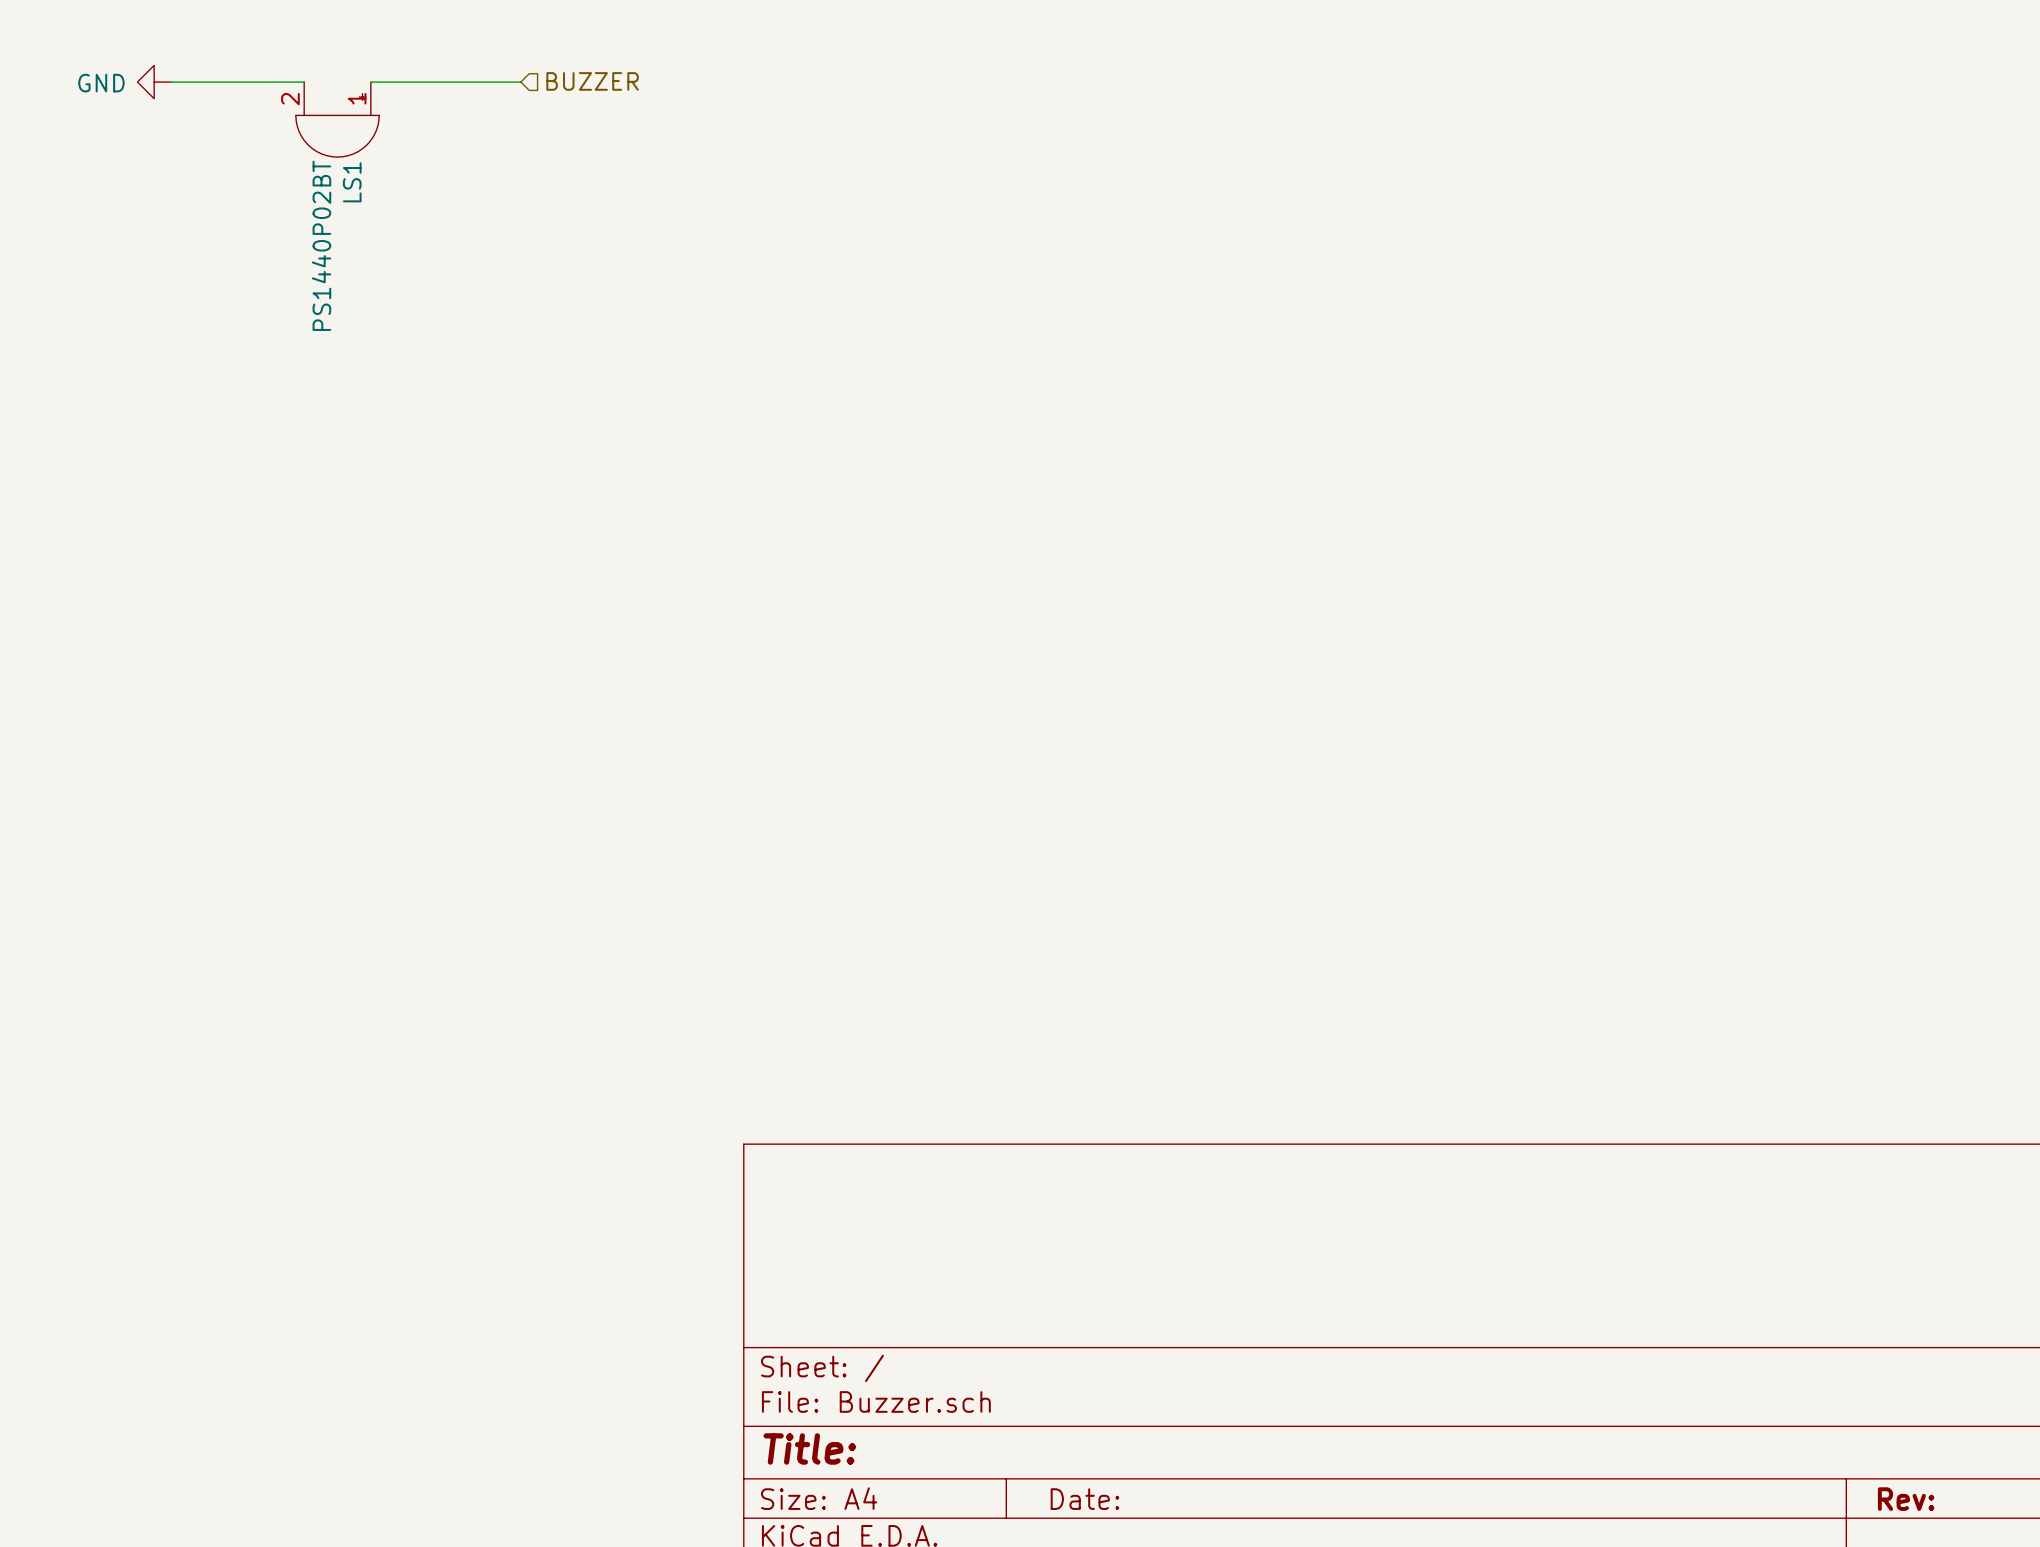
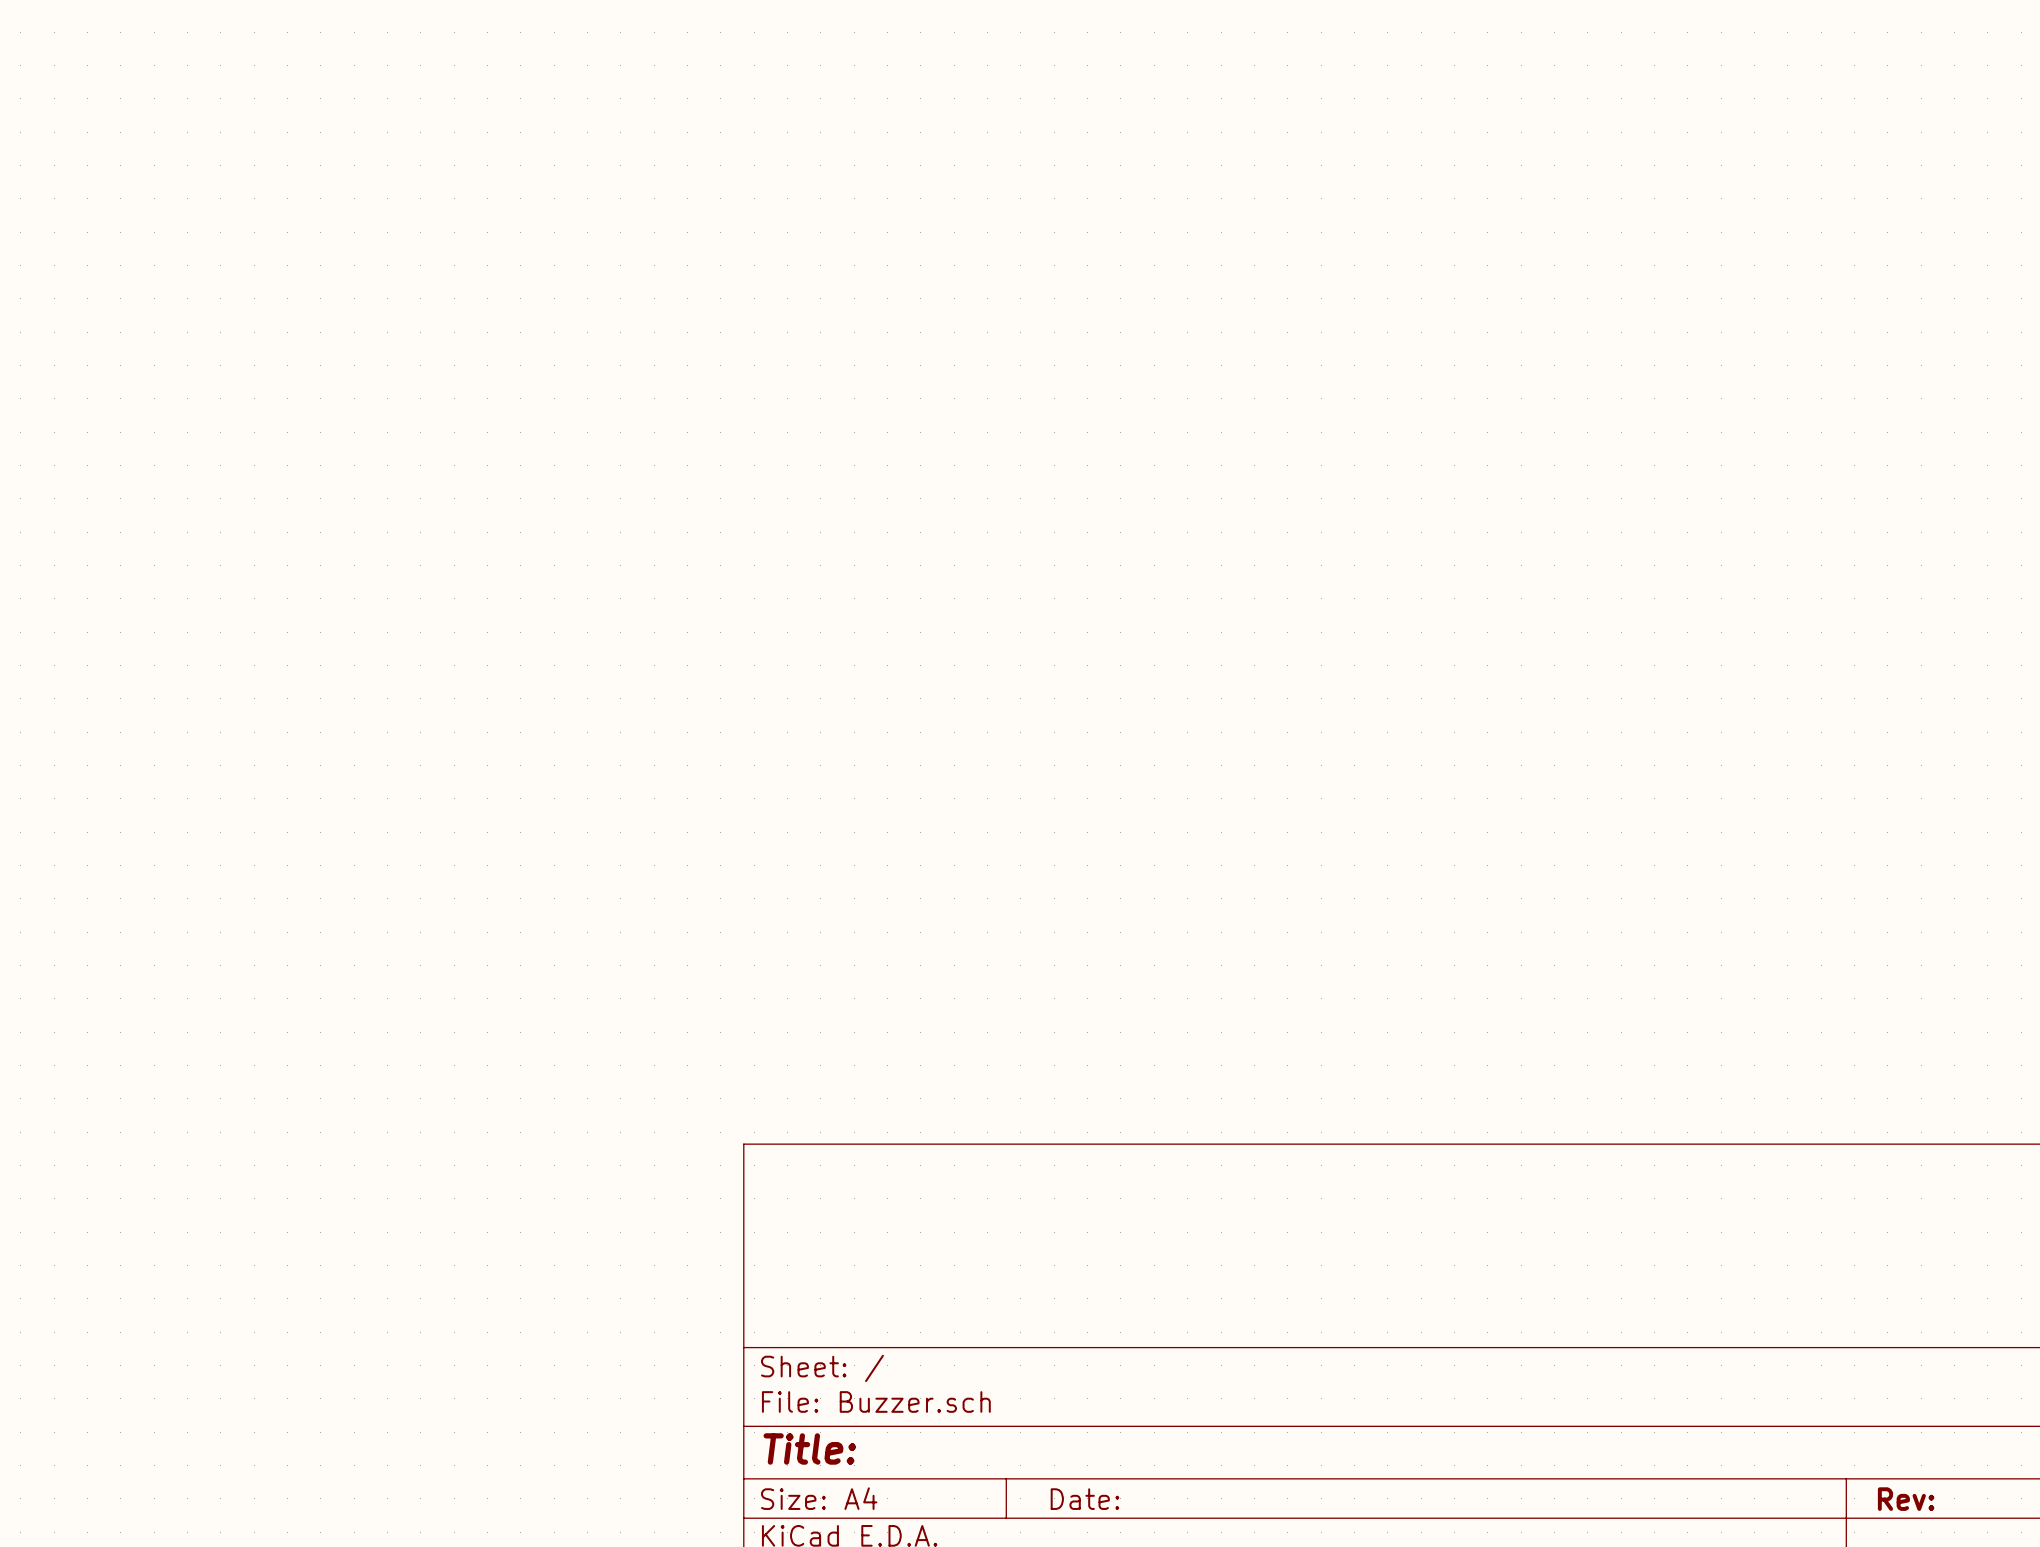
hierarchical label: BUZZER (592, 81) -> none
power symbol: GND (154, 82) -> none
wire: (170, 82) (304, 82) -> none
wire: (370, 82) (520, 82) -> none
LS1: PS1440P02BT (337, 119) -> none

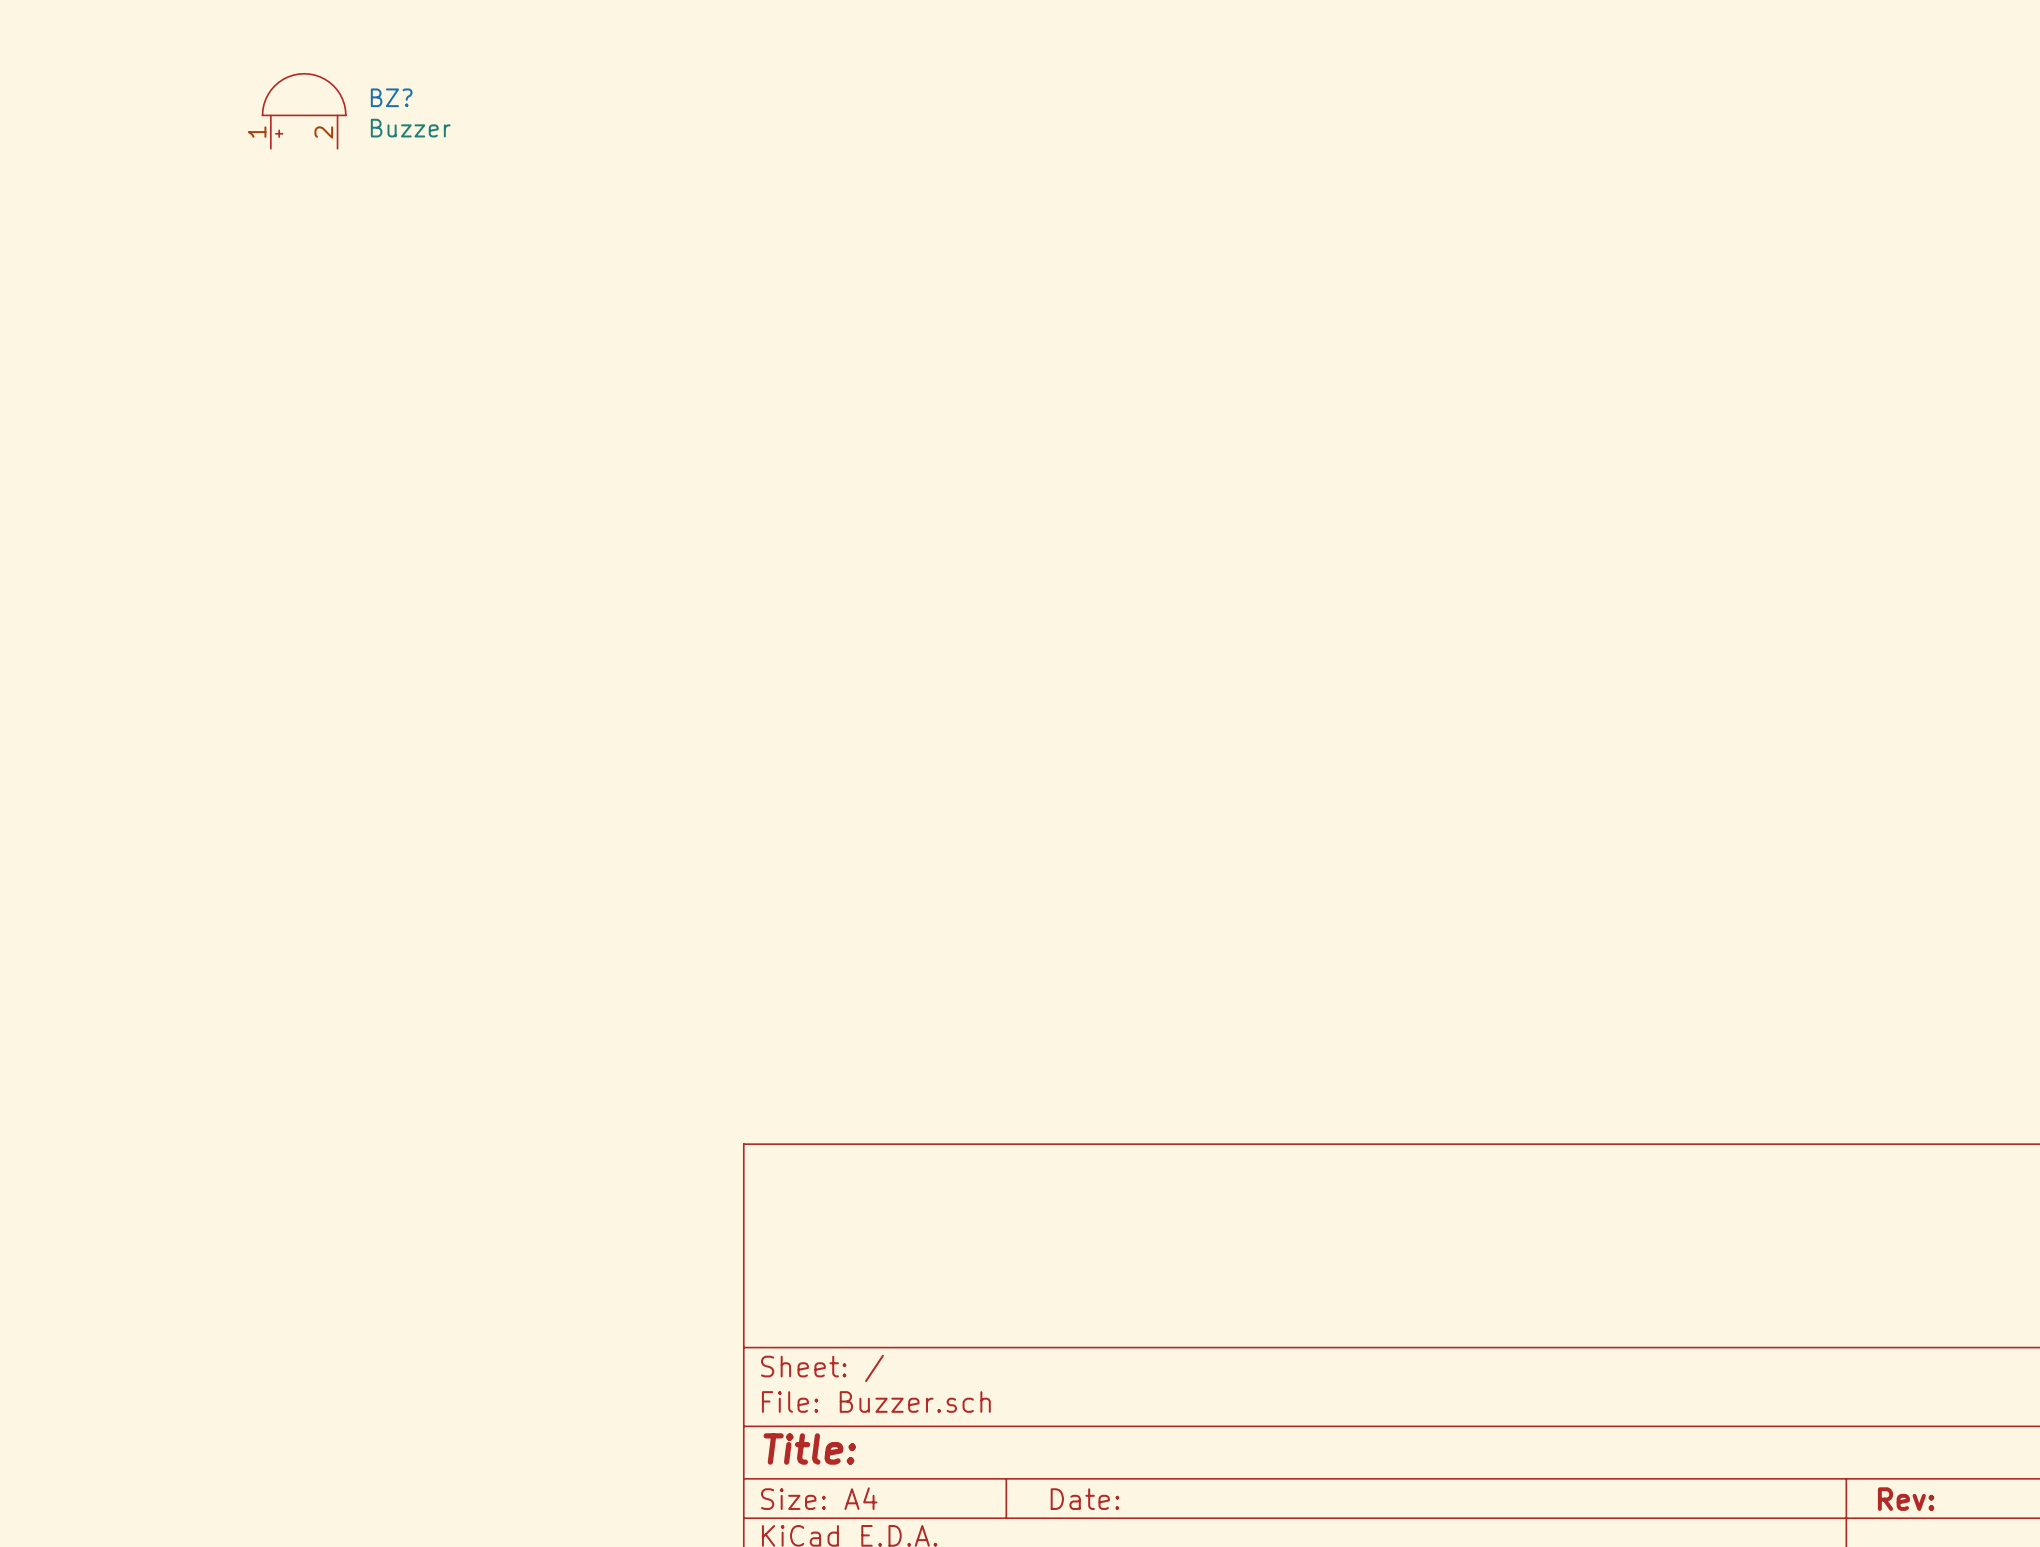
BZ?: none -> Buzzer (304, 111)

